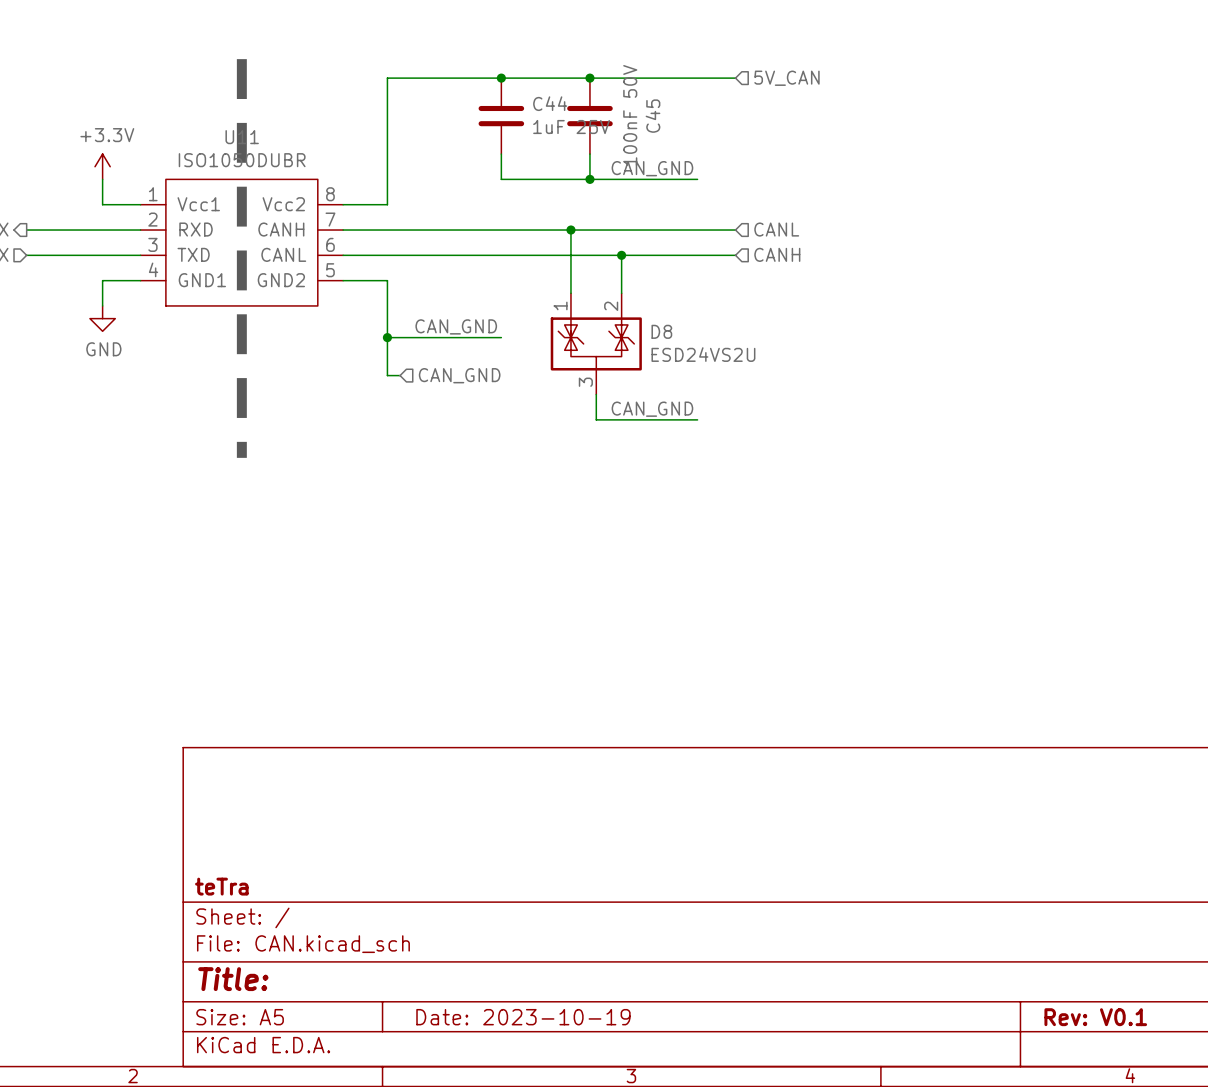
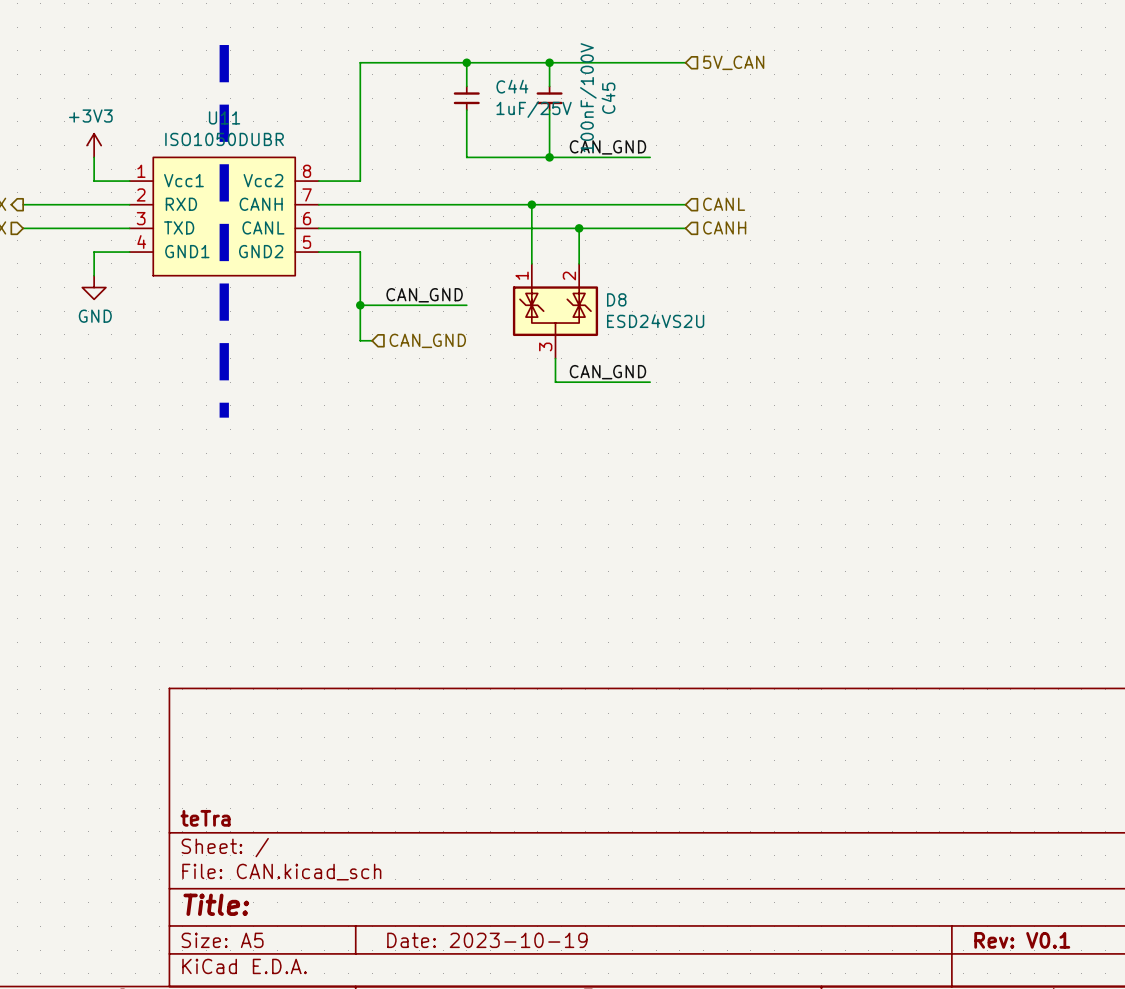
C44 symbol: [478, 78, 525, 155] -> [453, 86, 480, 111]
C45 symbol: [567, 78, 613, 155] -> [536, 86, 563, 111]
C45 value: 100nF 50V (630, 115) -> 100nF/100V (588, 97)
C44 value: 1uF 25V (571, 127) -> 1uF/25V (534, 109)
power symbol: +3.3V (102, 166) -> +3V3 (94, 145)

